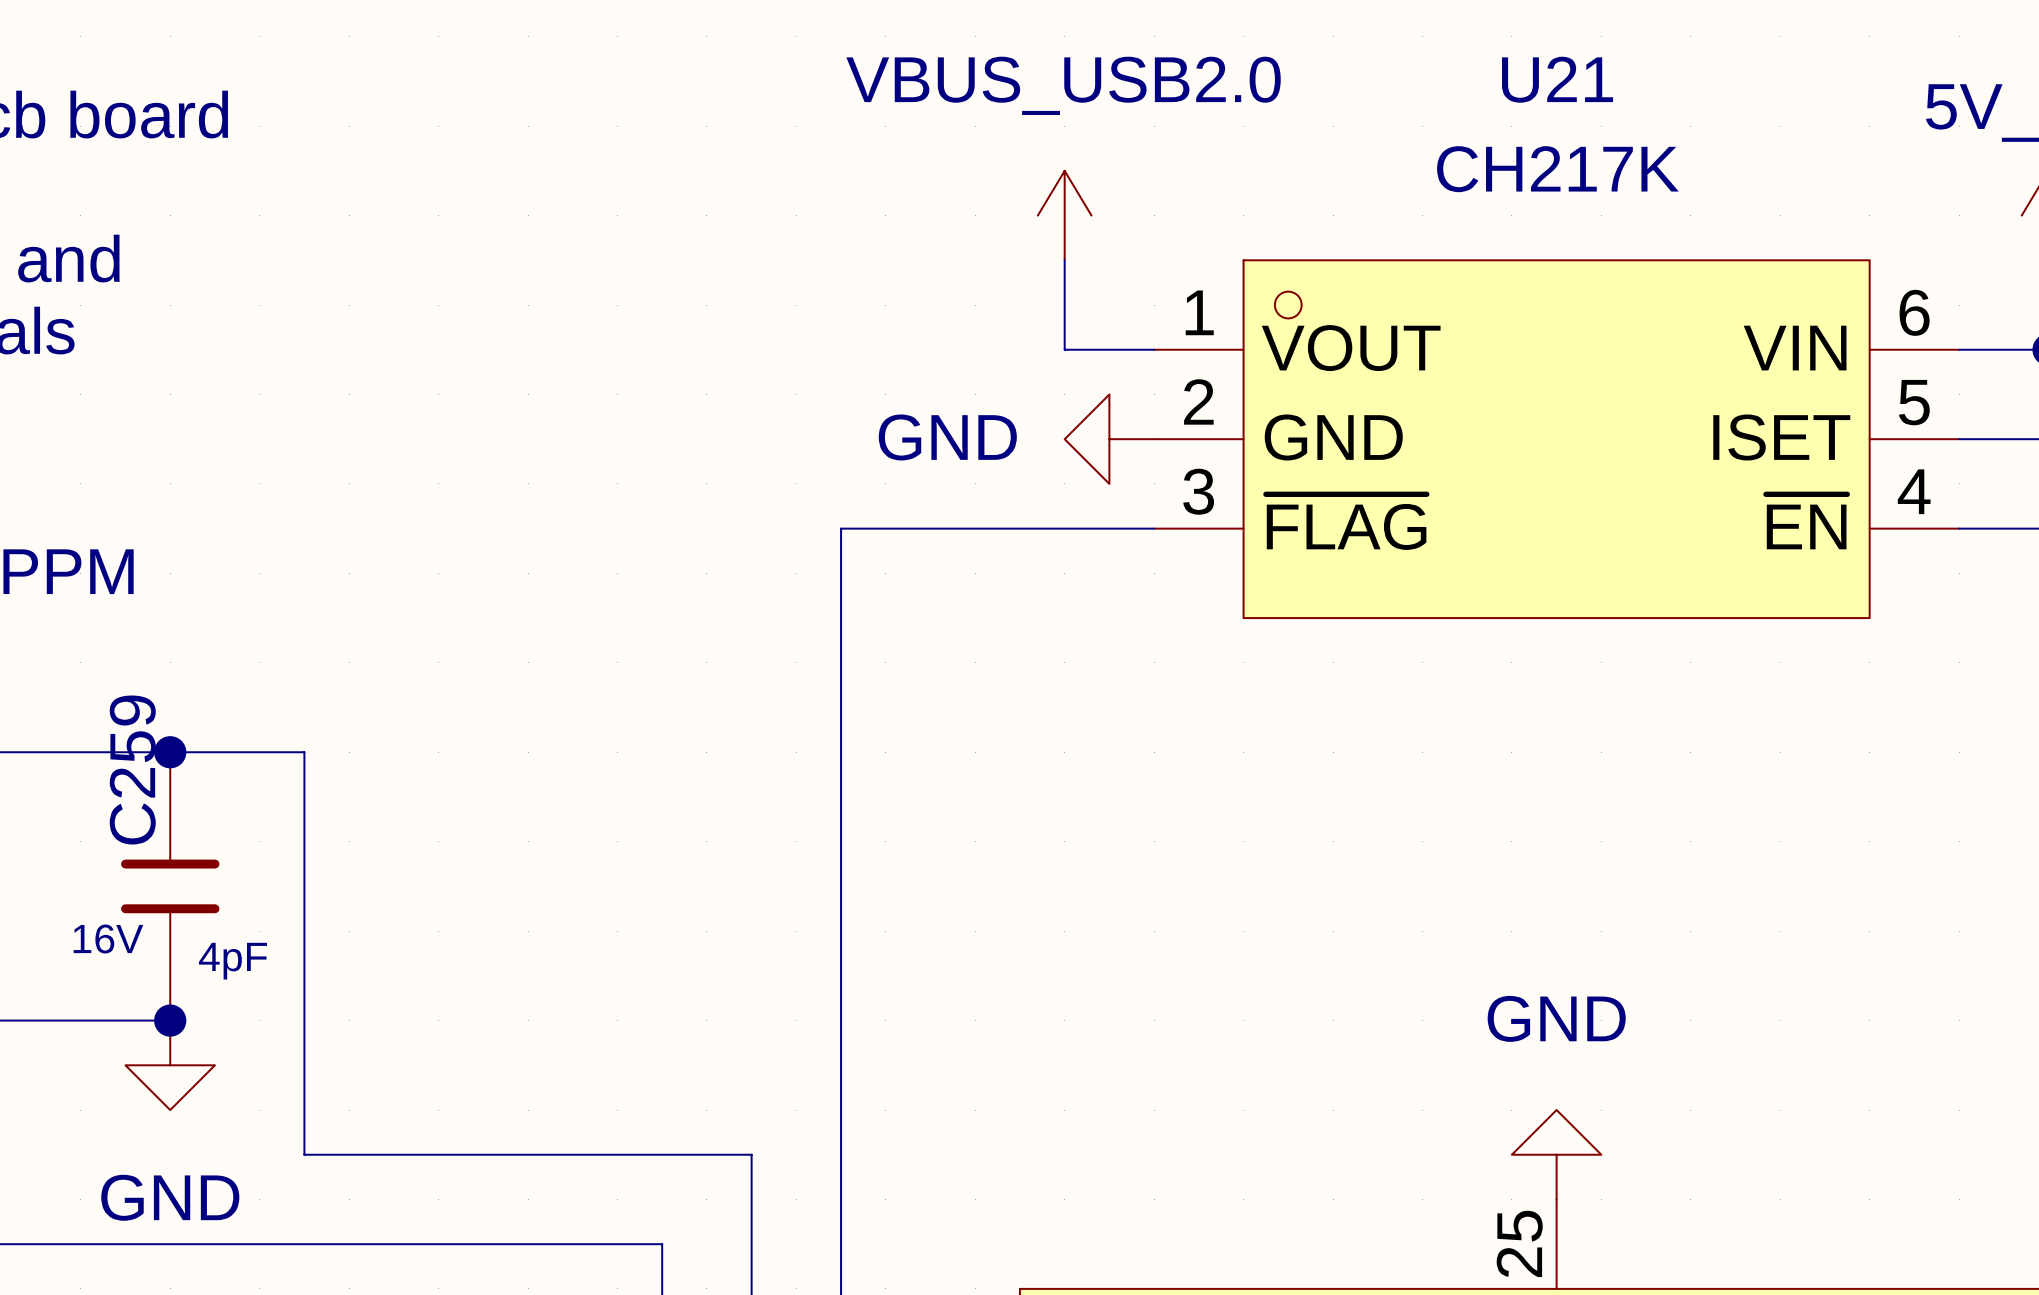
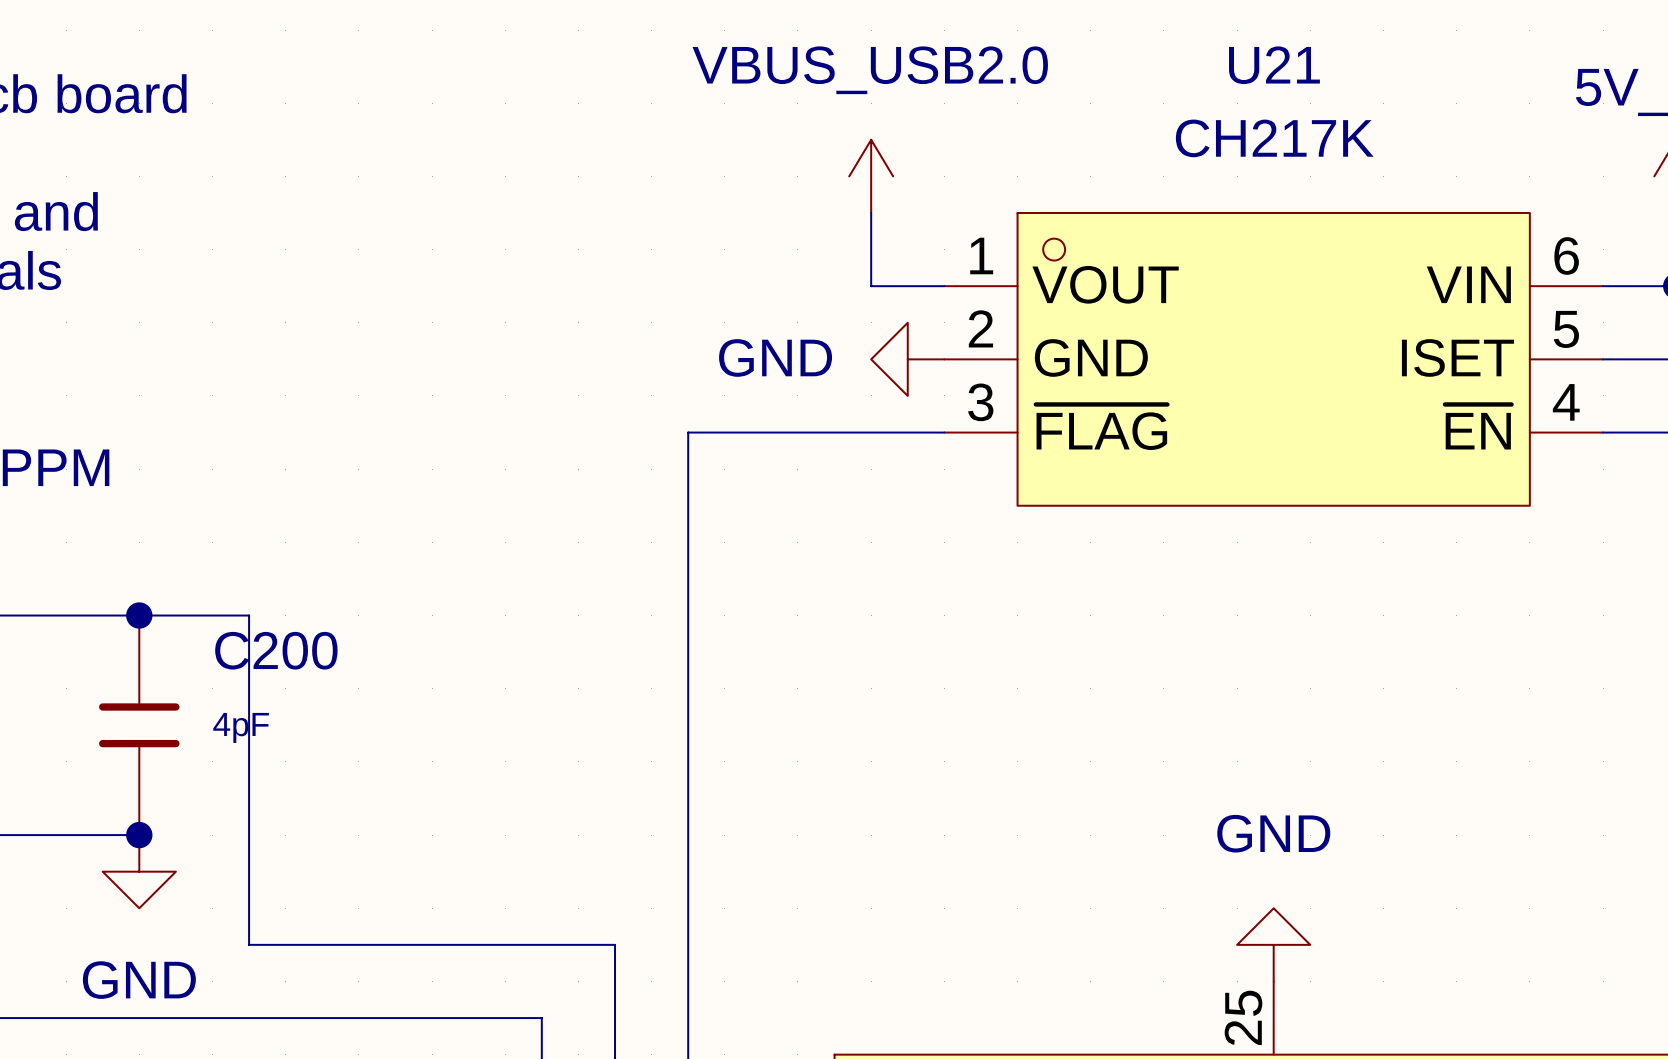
C259 name: C259 (132, 770) -> C200 (276, 650)
C259 text: 16V (108, 939) -> none
C259 value position: 4pF (232, 961) -> 4pF (241, 727)

